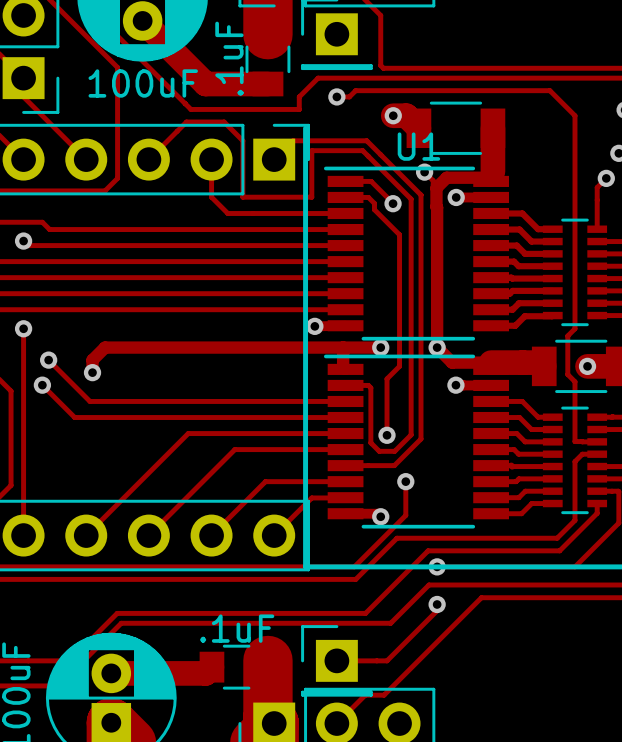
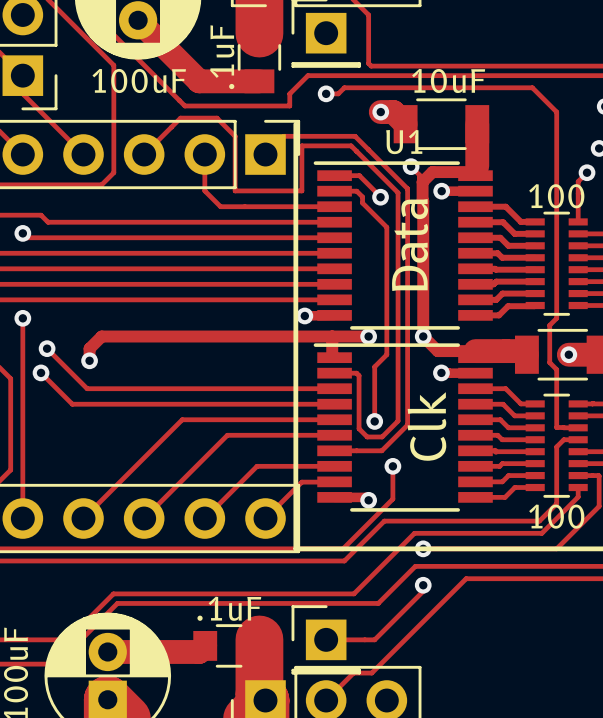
part value: none -> 10uF (448, 80)
part value: none -> 100 (556, 196)
text: none -> Data (410, 245)
text: none -> Clk (426, 426)
part value: none -> 100 (556, 516)

